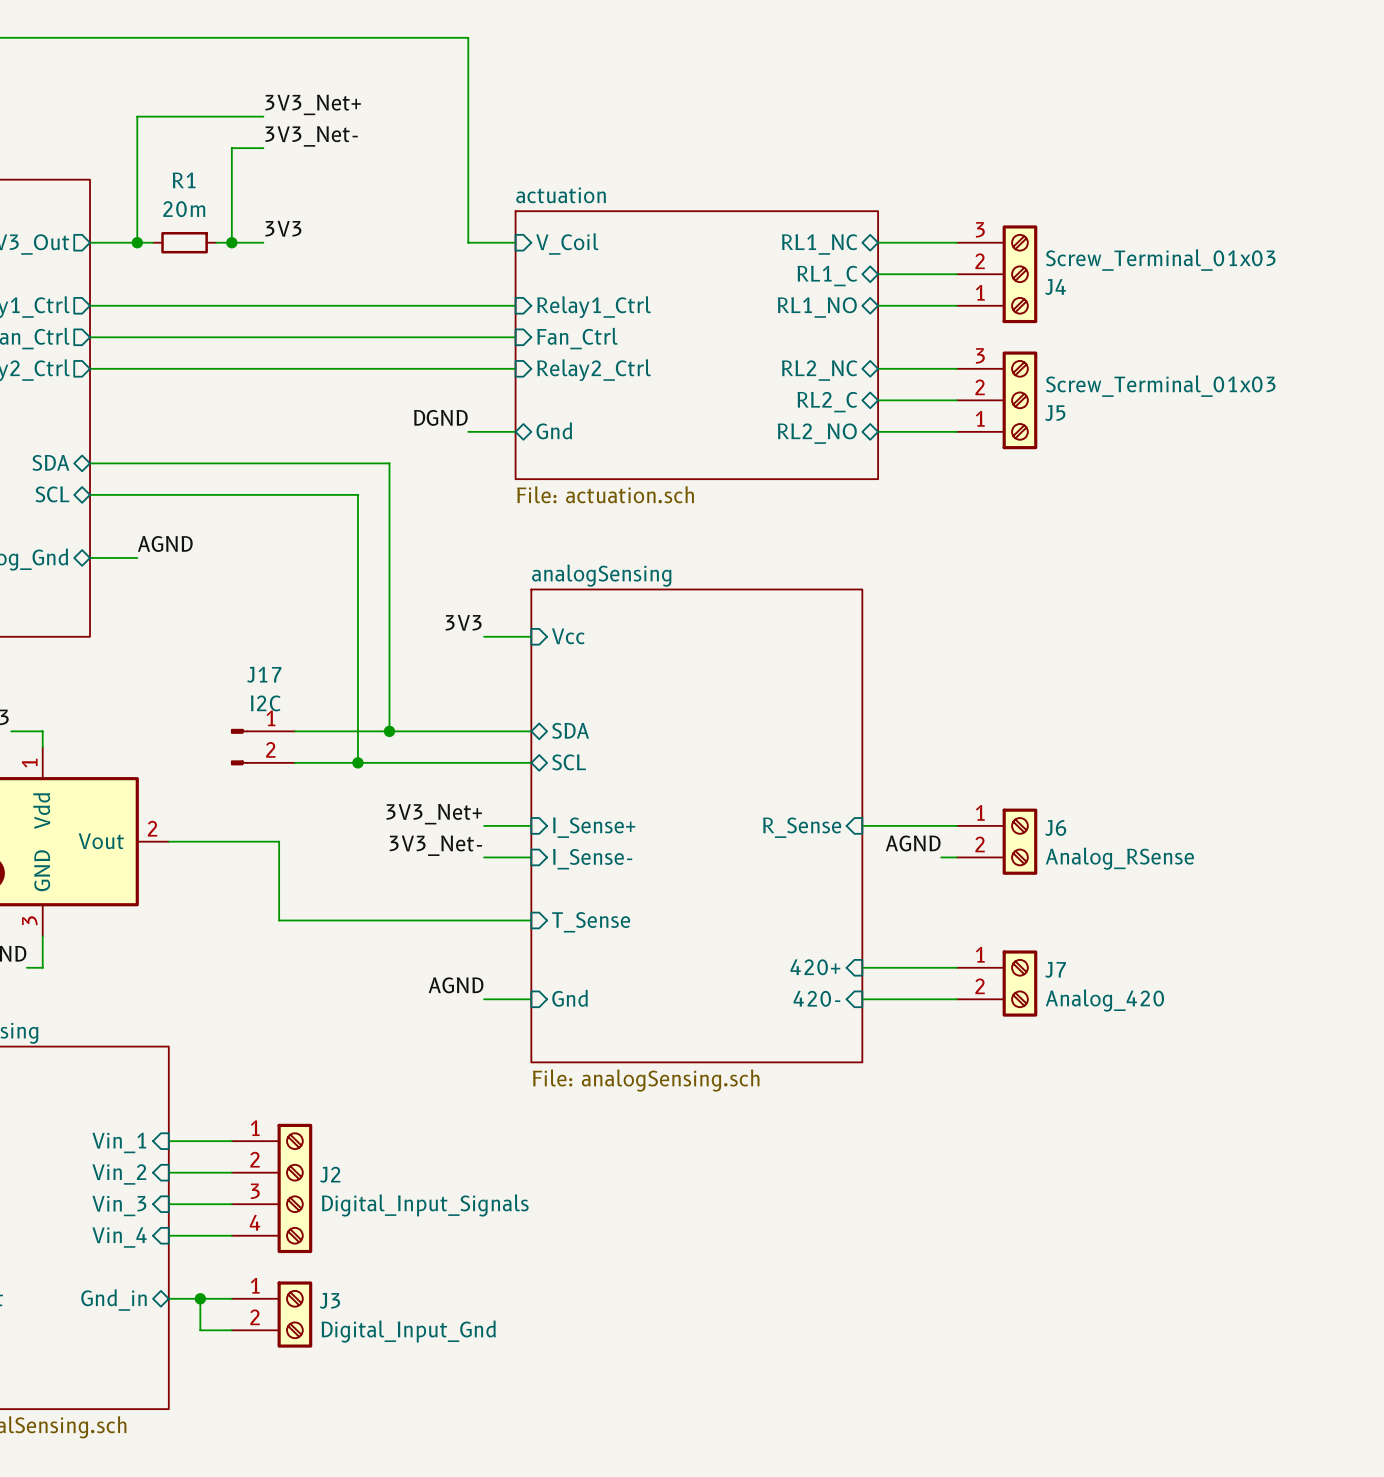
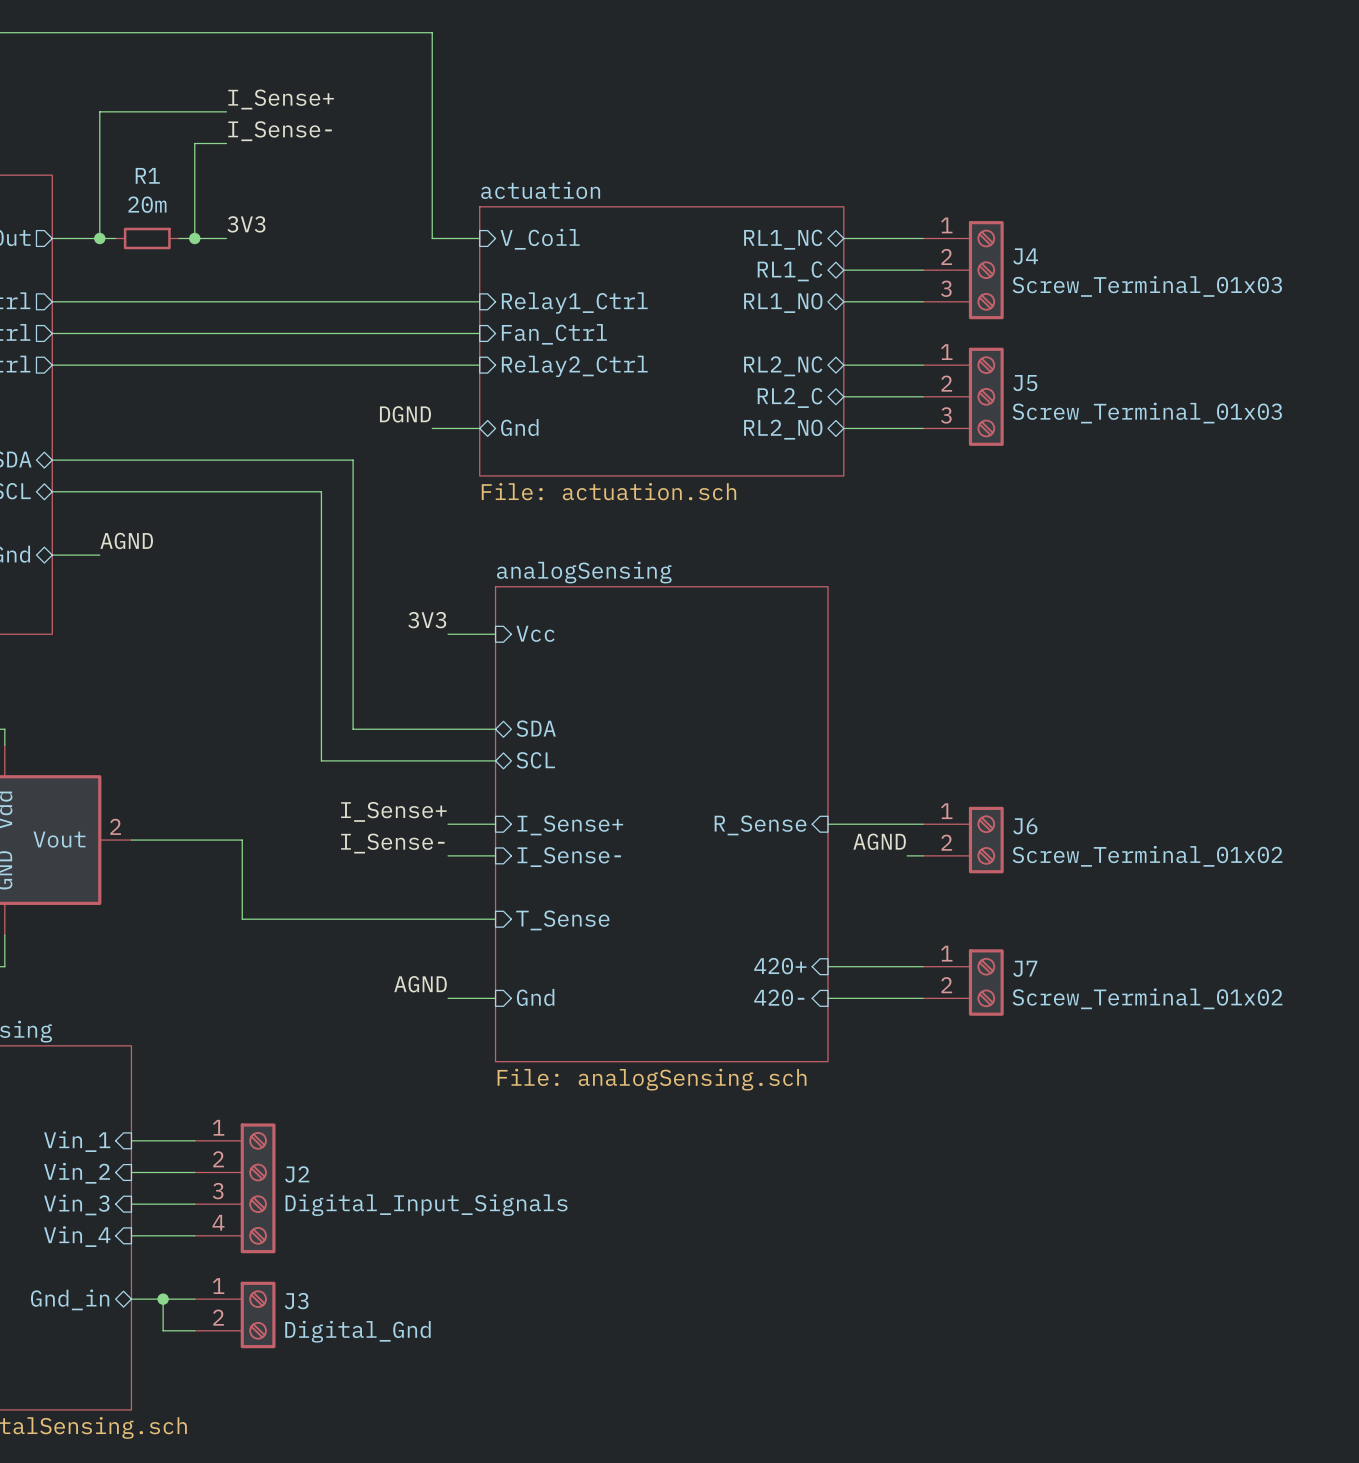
label: 3V3_Net+ (313, 104) -> I_Sense+ (281, 99)
label: 3V3_Net- (311, 136) -> I_Sense- (280, 131)
J4 flip: as is (1019, 274) -> up-down (986, 270)
J5 flip: as is (1019, 400) -> up-down (986, 396)
wire: (294, 731) (389, 731) -> none
junction: (389, 731) -> none
J17: I2C (262, 747) -> none
wire: (294, 762) (357, 762) -> none
junction: (357, 762) -> none
label: 3V3_Net+ (434, 814) -> I_Sense+ (393, 811)
label: 3V3_Net- (435, 845) -> I_Sense- (392, 843)
J6 value: Analog_RSense (1119, 858) -> Screw_Terminal_01x02 (1147, 856)
J7 value: Analog_420 (1104, 1000) -> Screw_Terminal_01x02 (1147, 998)
J3 value: Digital_Input_Gnd (408, 1331) -> Digital_Gnd (357, 1331)

